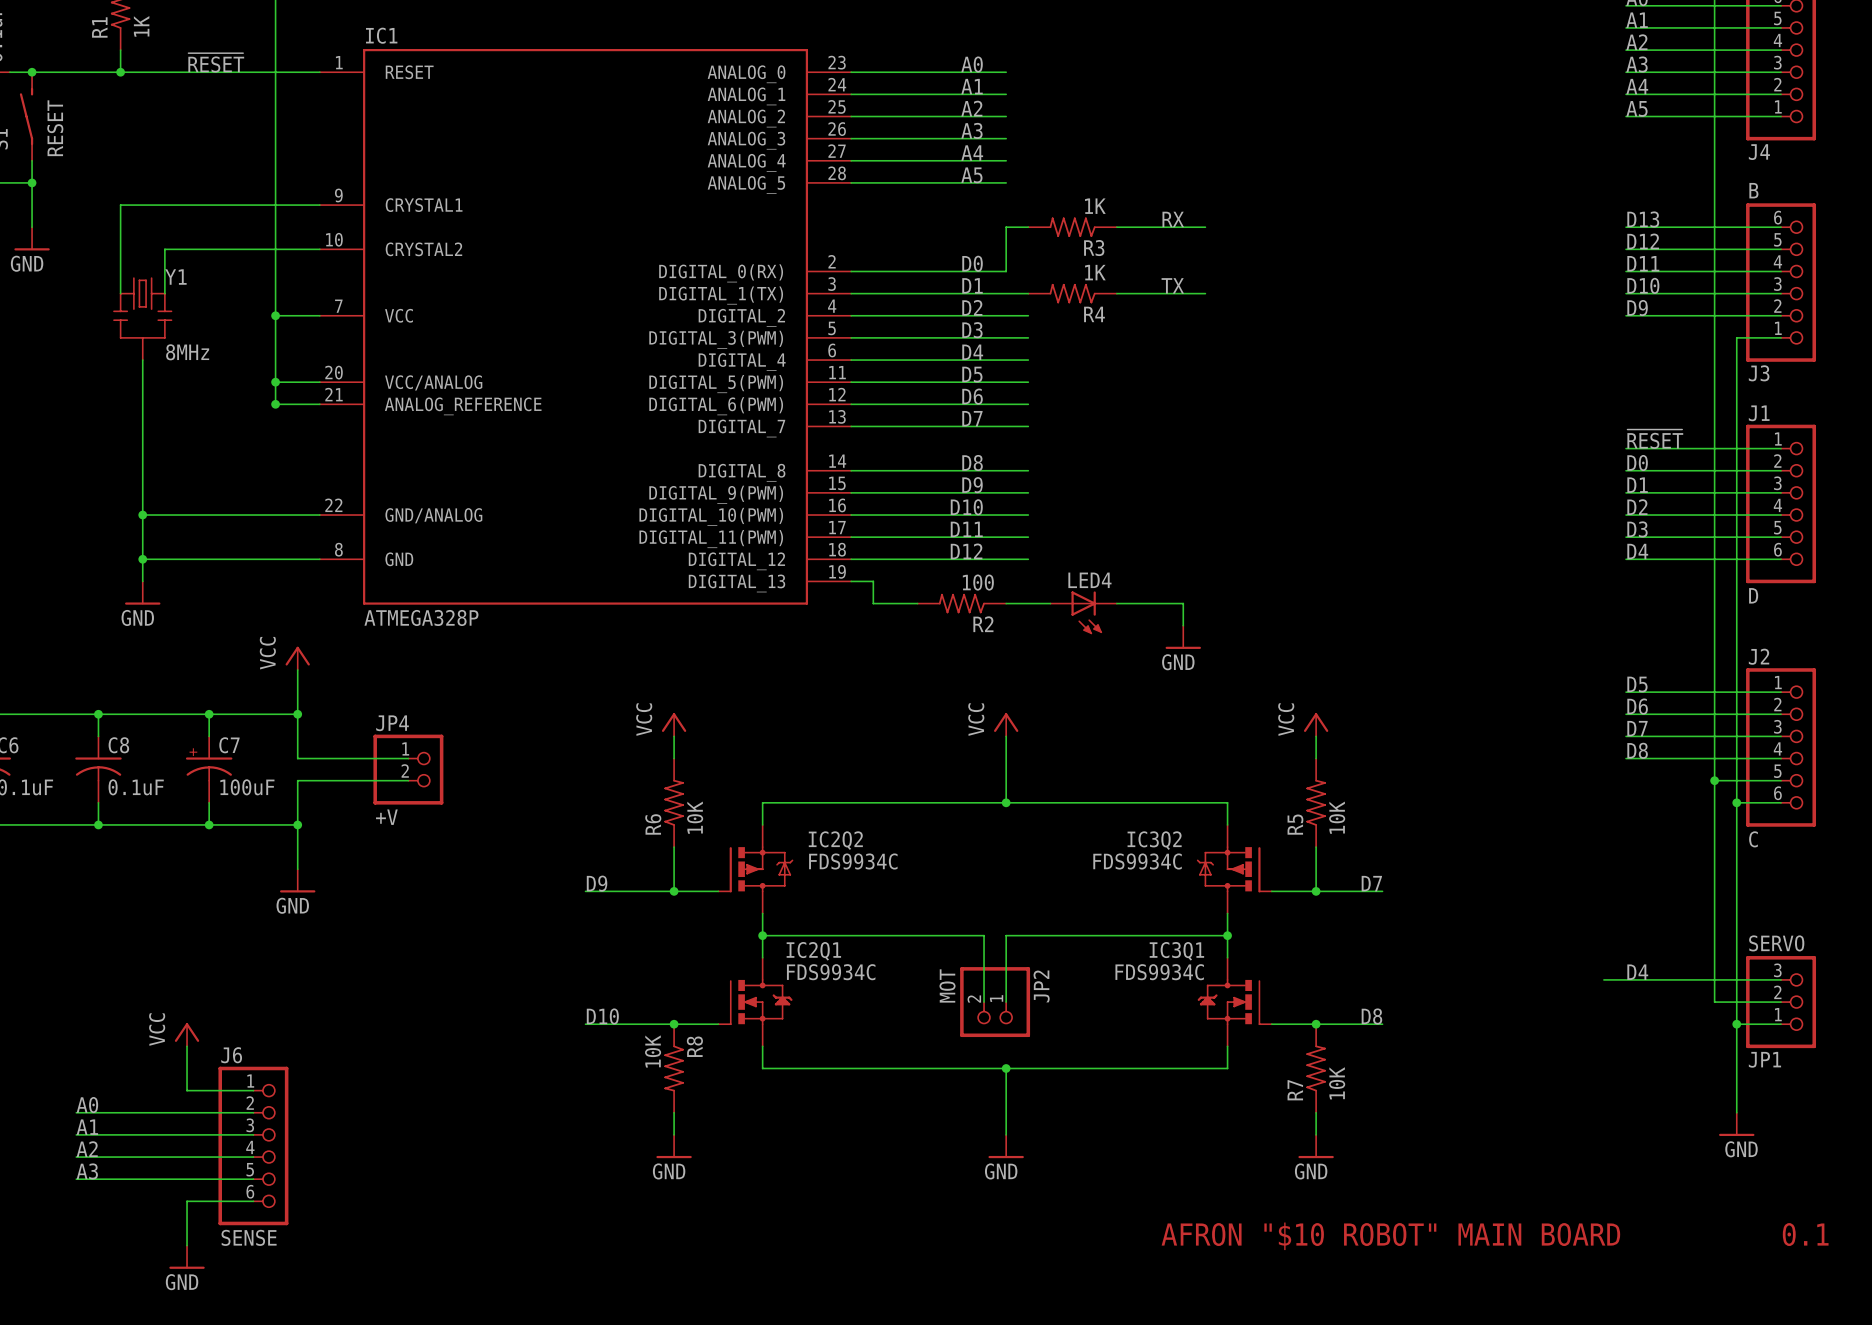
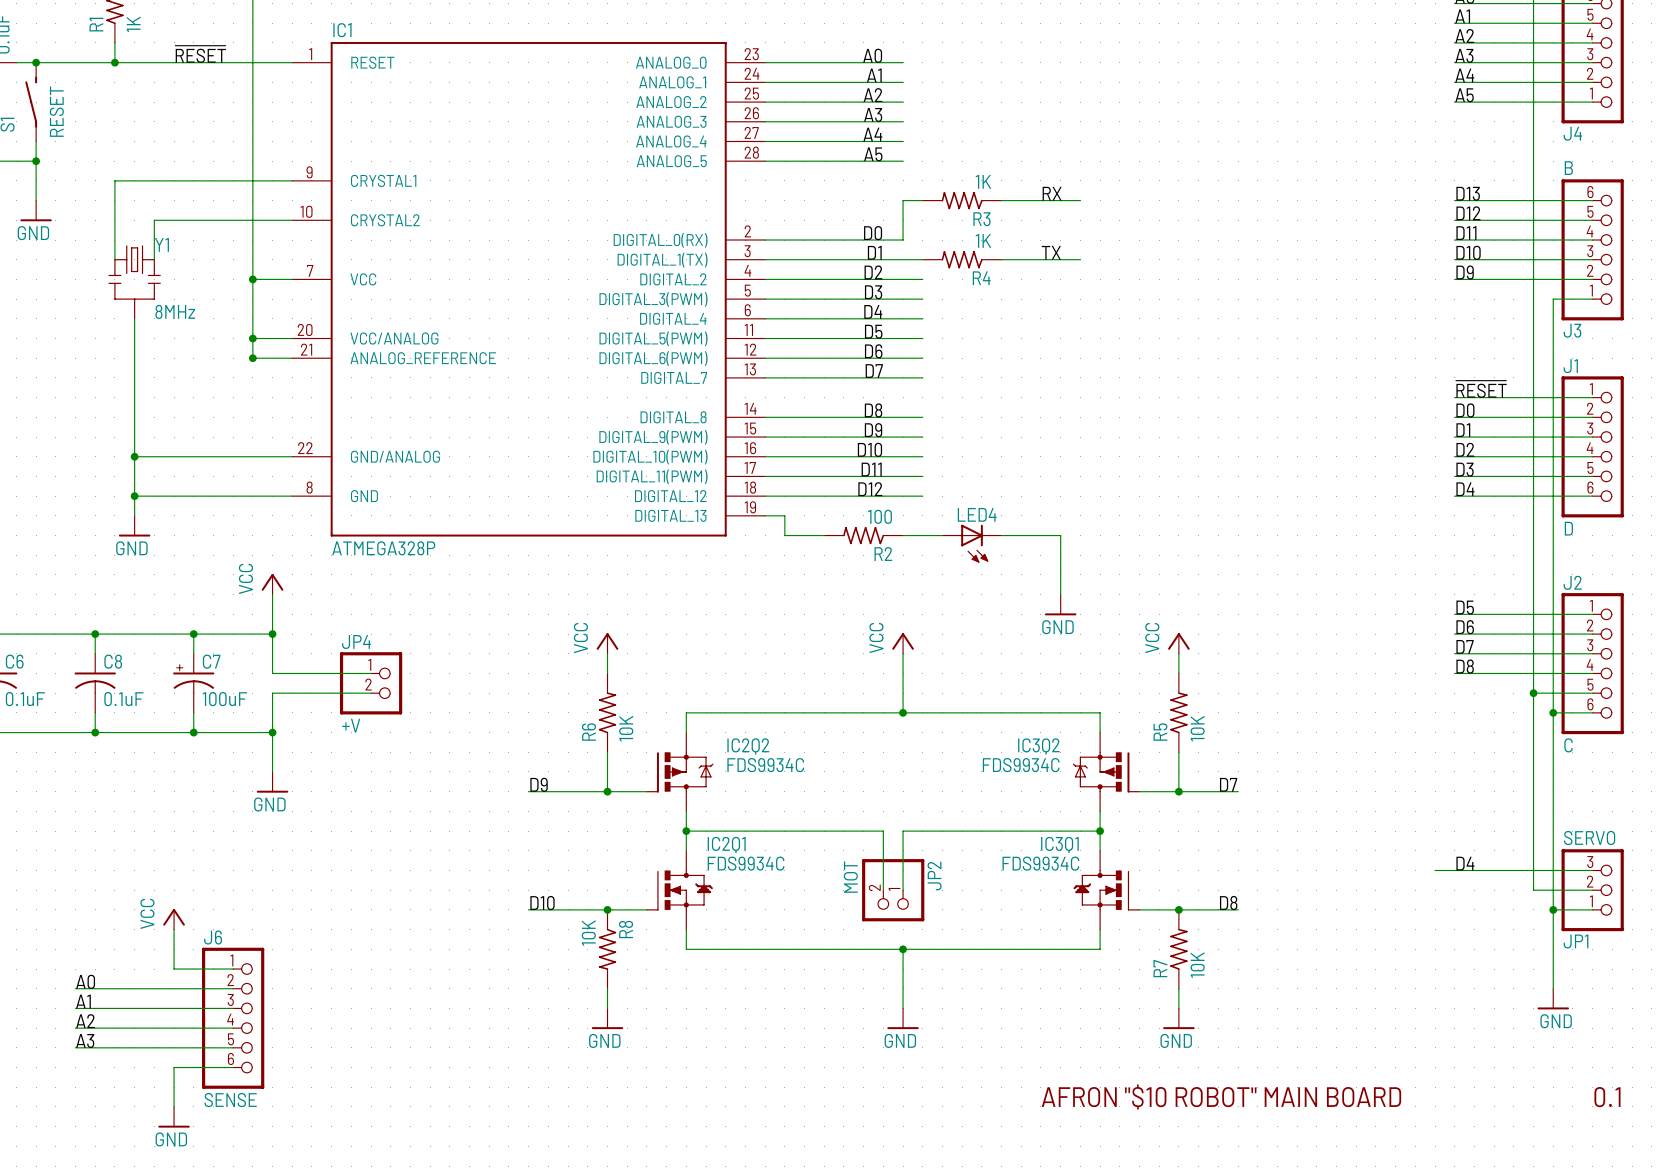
power symbol position: GND (1183, 637) -> GND (1060, 605)

